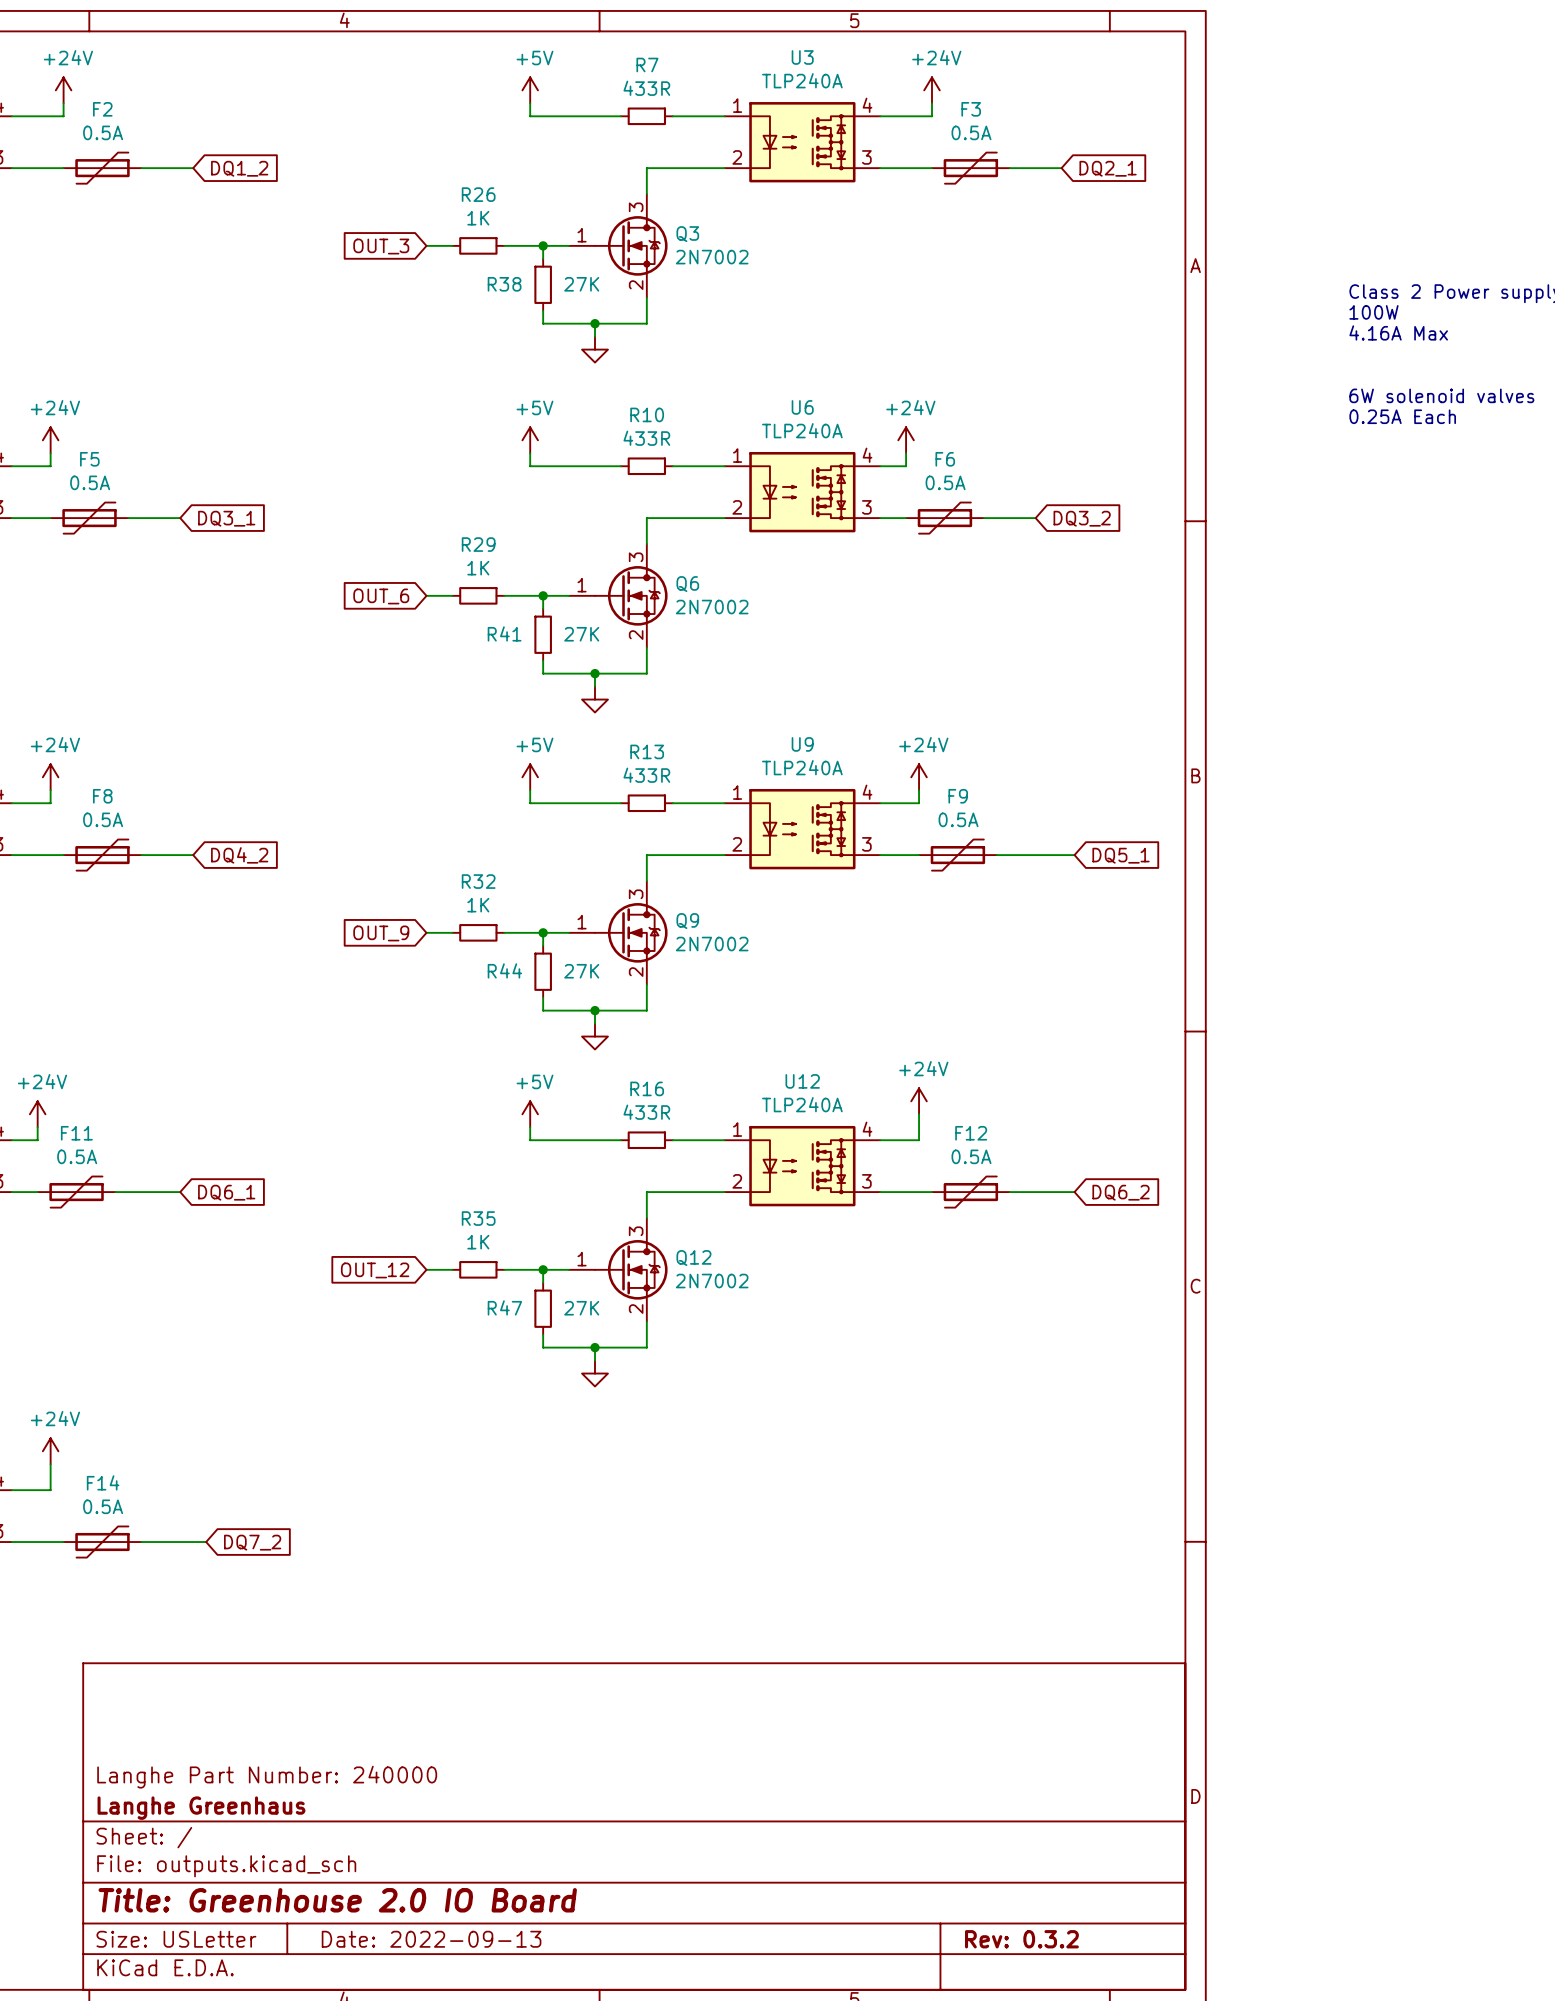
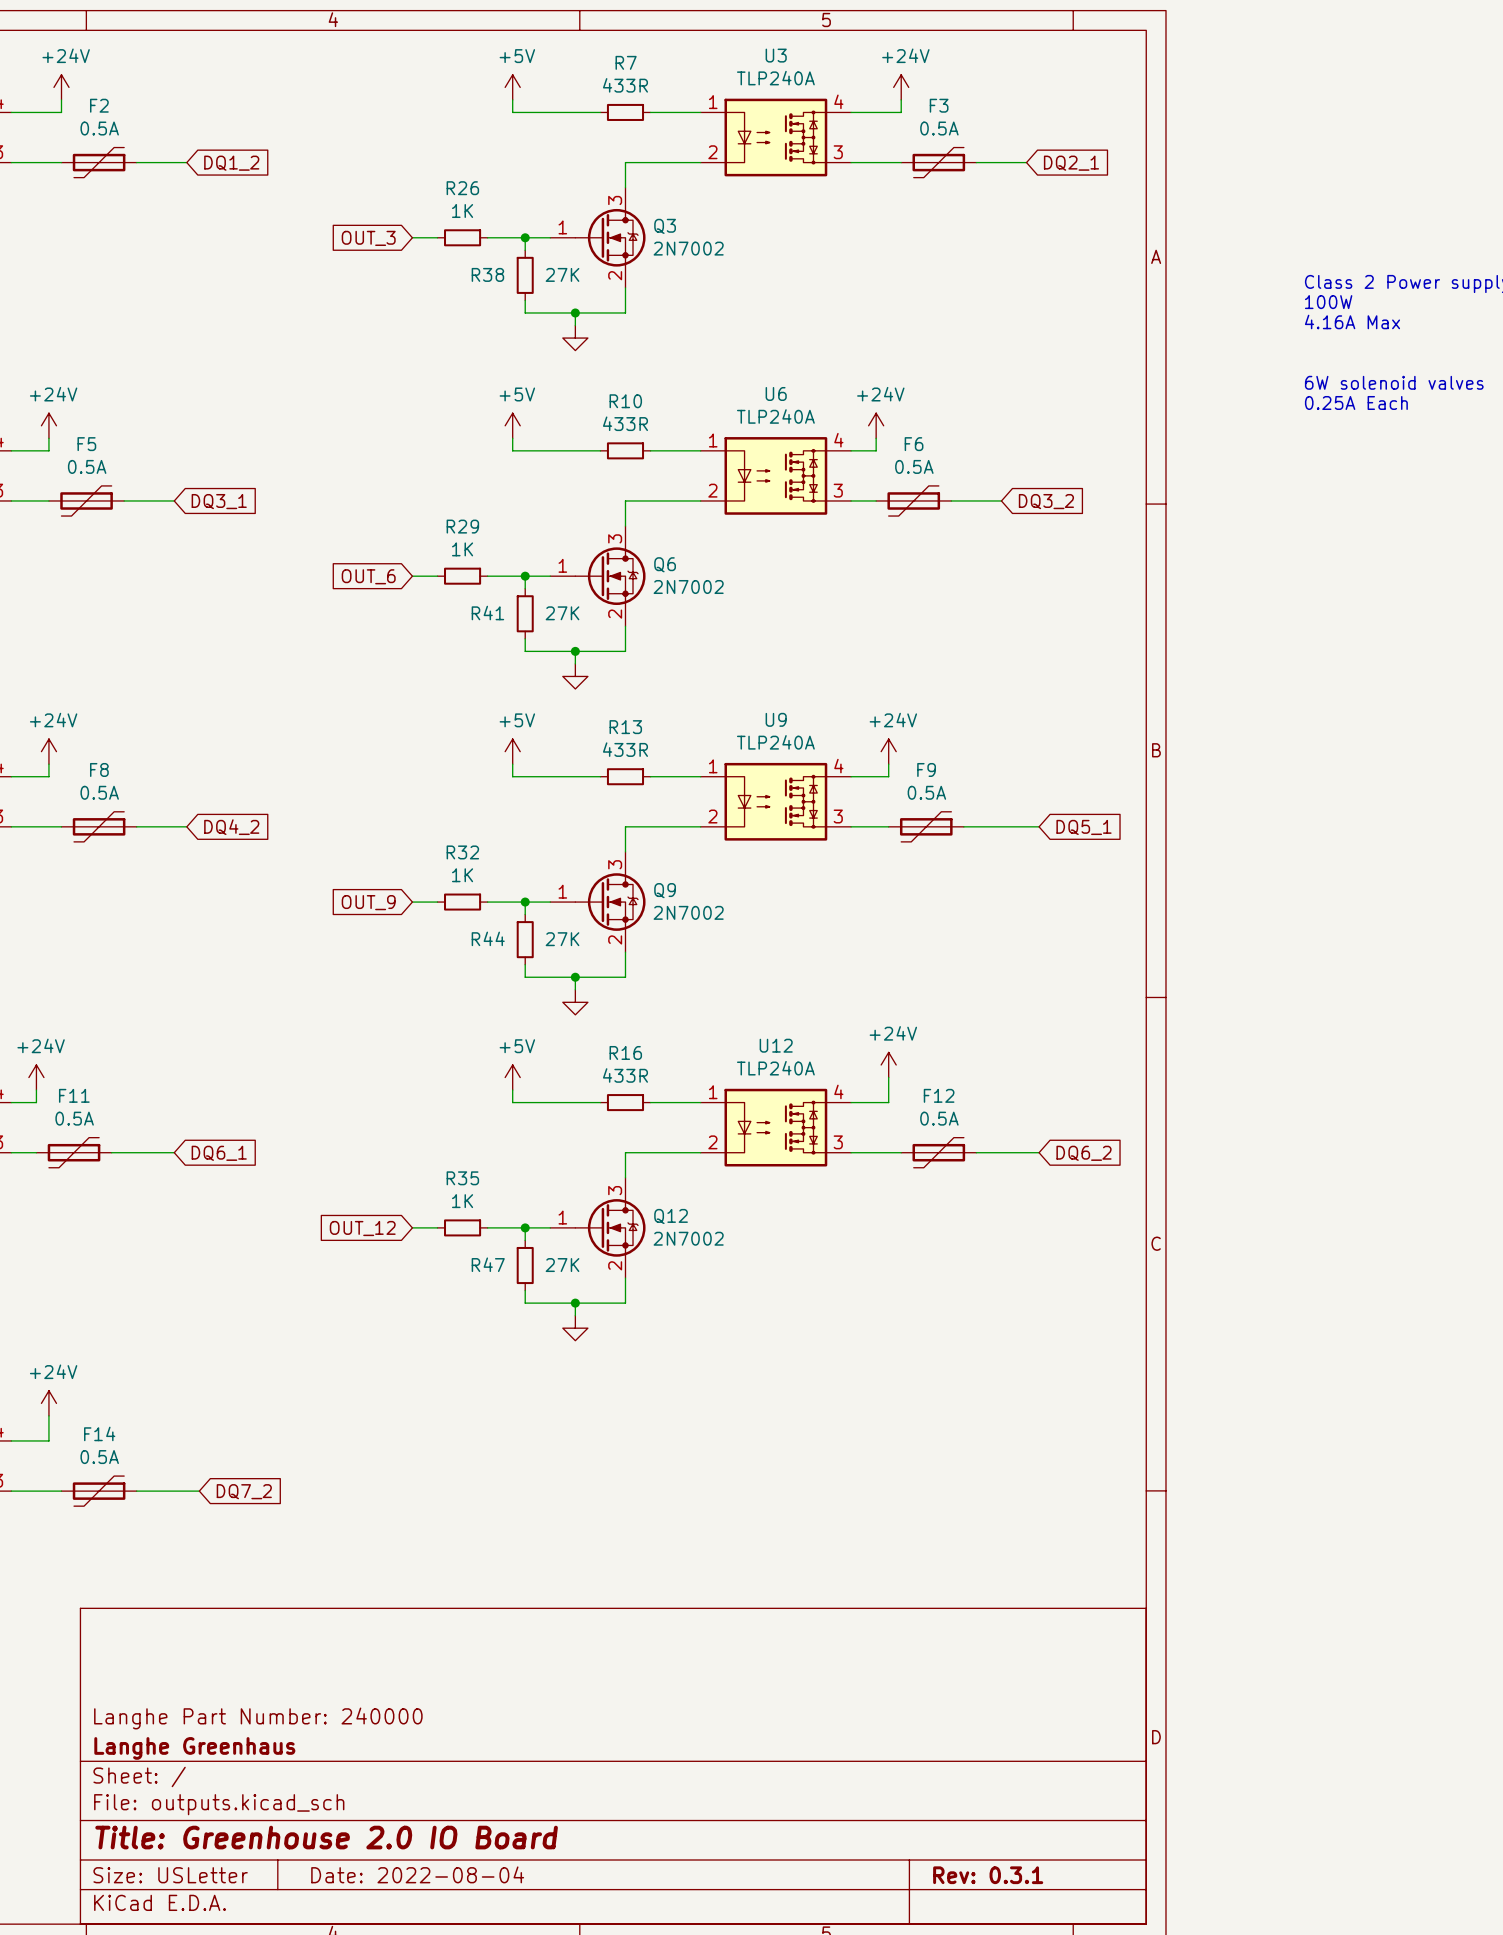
title block: Date: 2022-09-13 (431, 1939) -> Date: 2022-08-04 (417, 1874)
title block: Rev: 0.3.2 (1021, 1939) -> Rev: 0.3.1 (988, 1875)

